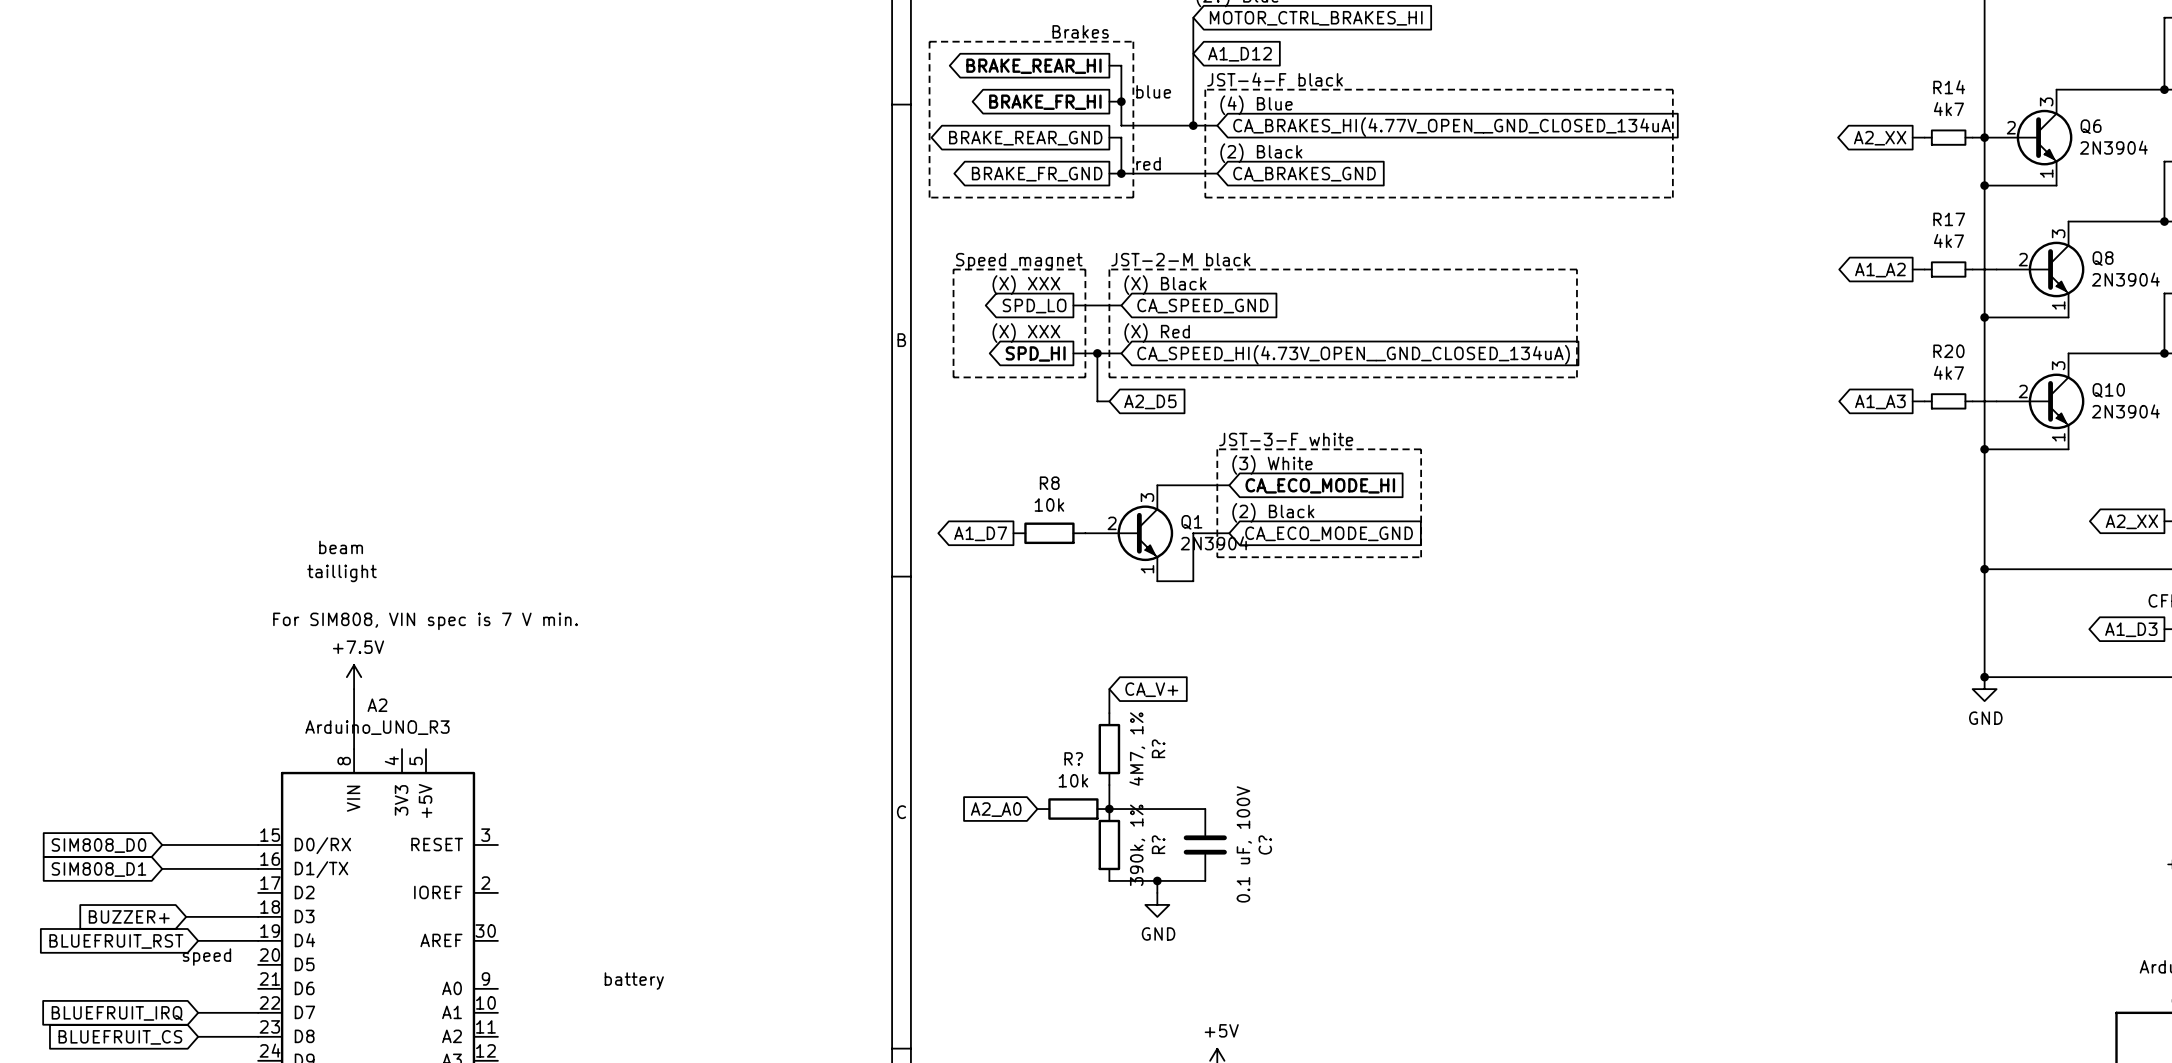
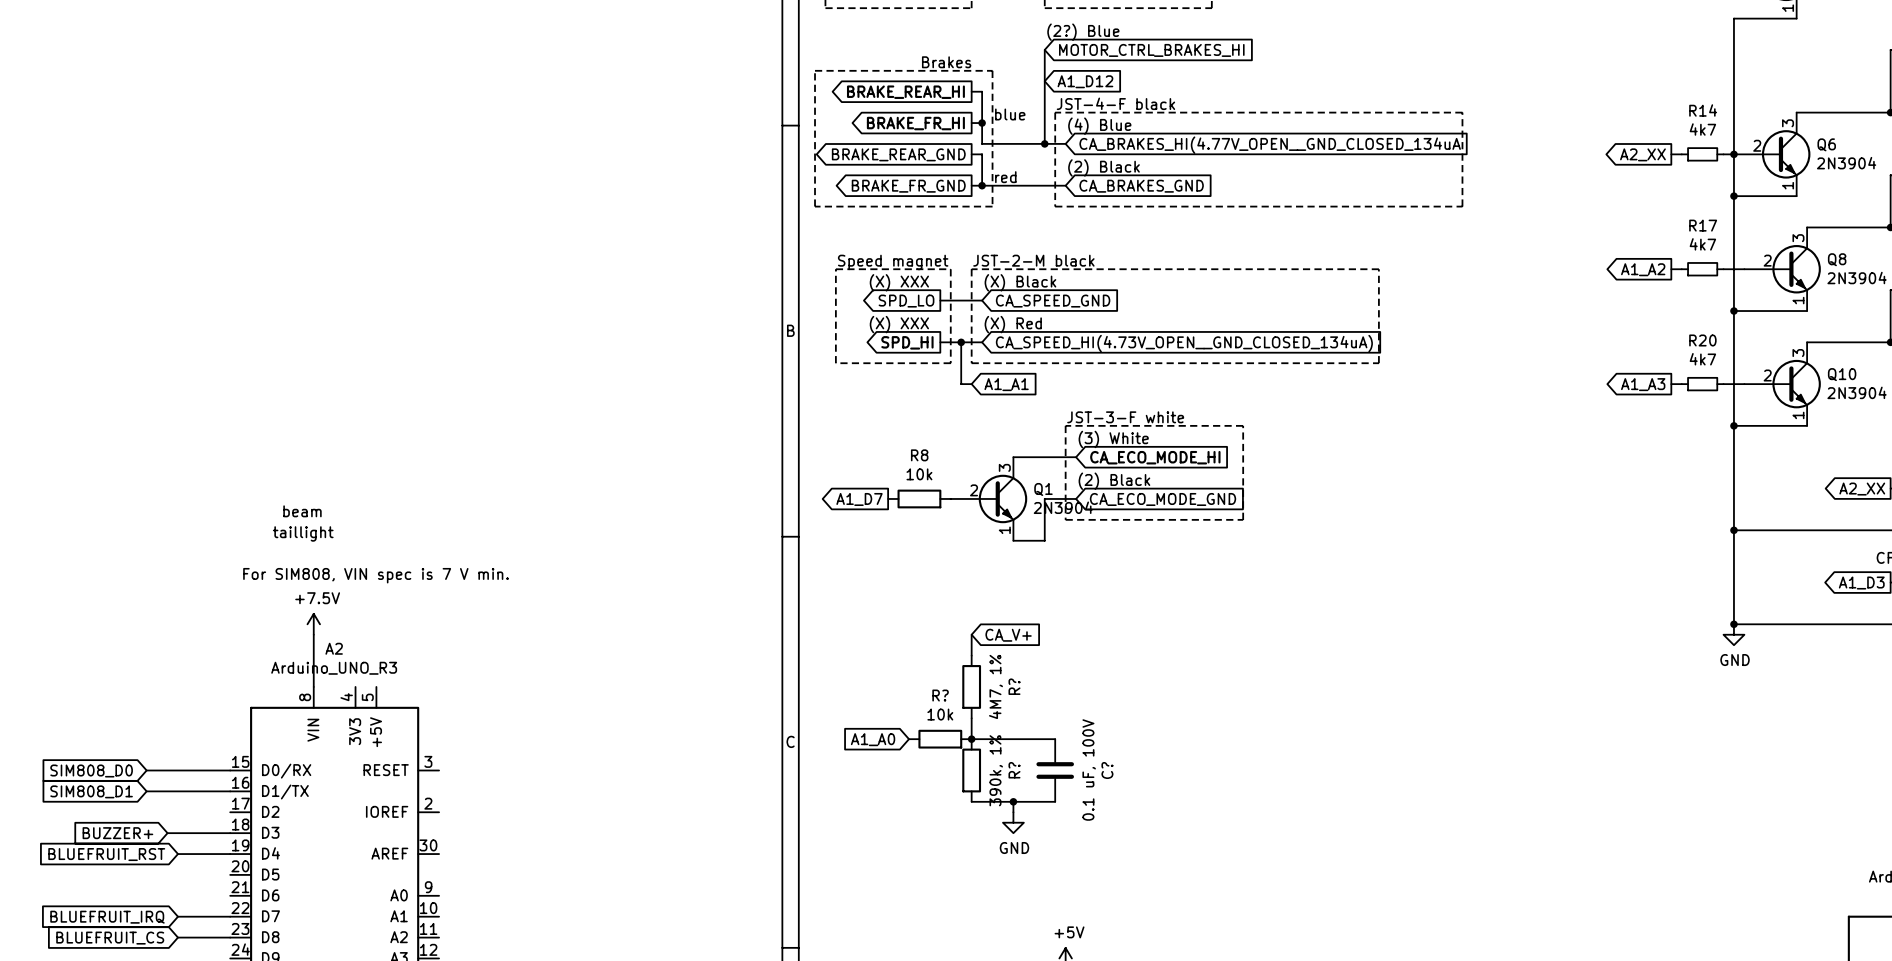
global label: A2_D5 (1150, 401) -> A1_A1 (1006, 384)
global label: A2_A0 (996, 809) -> A1_A0 (873, 739)
text: speed (206, 957) -> none
text: battery (634, 981) -> none

